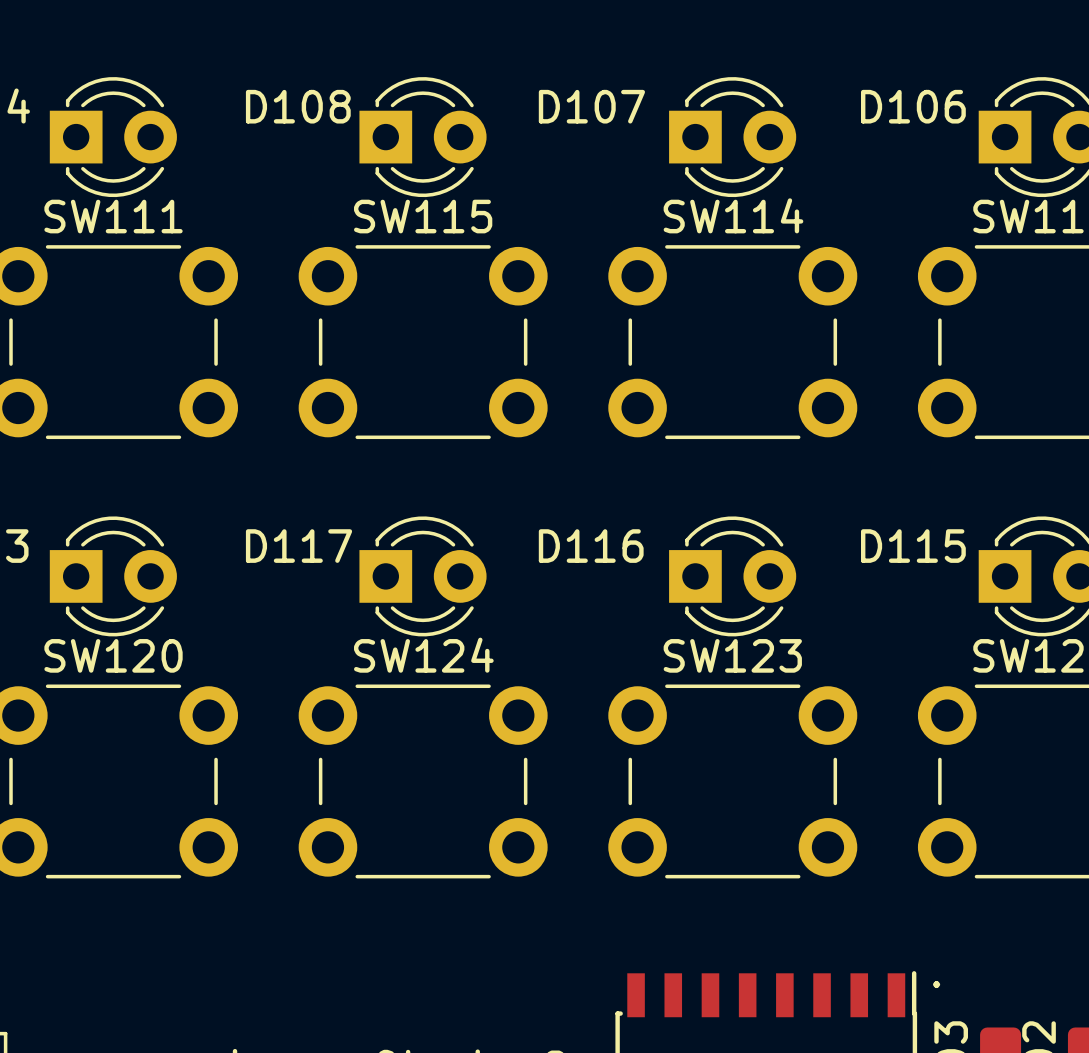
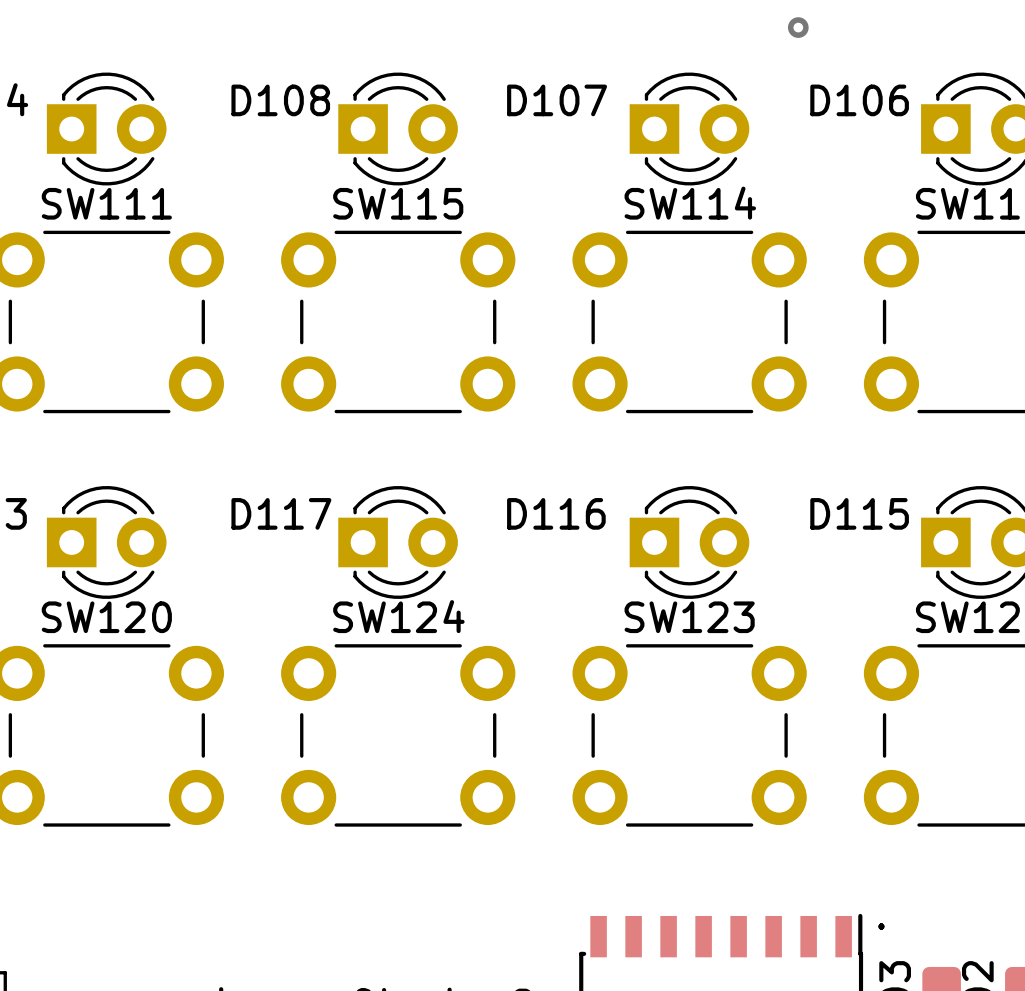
via: none -> (798, 27)

